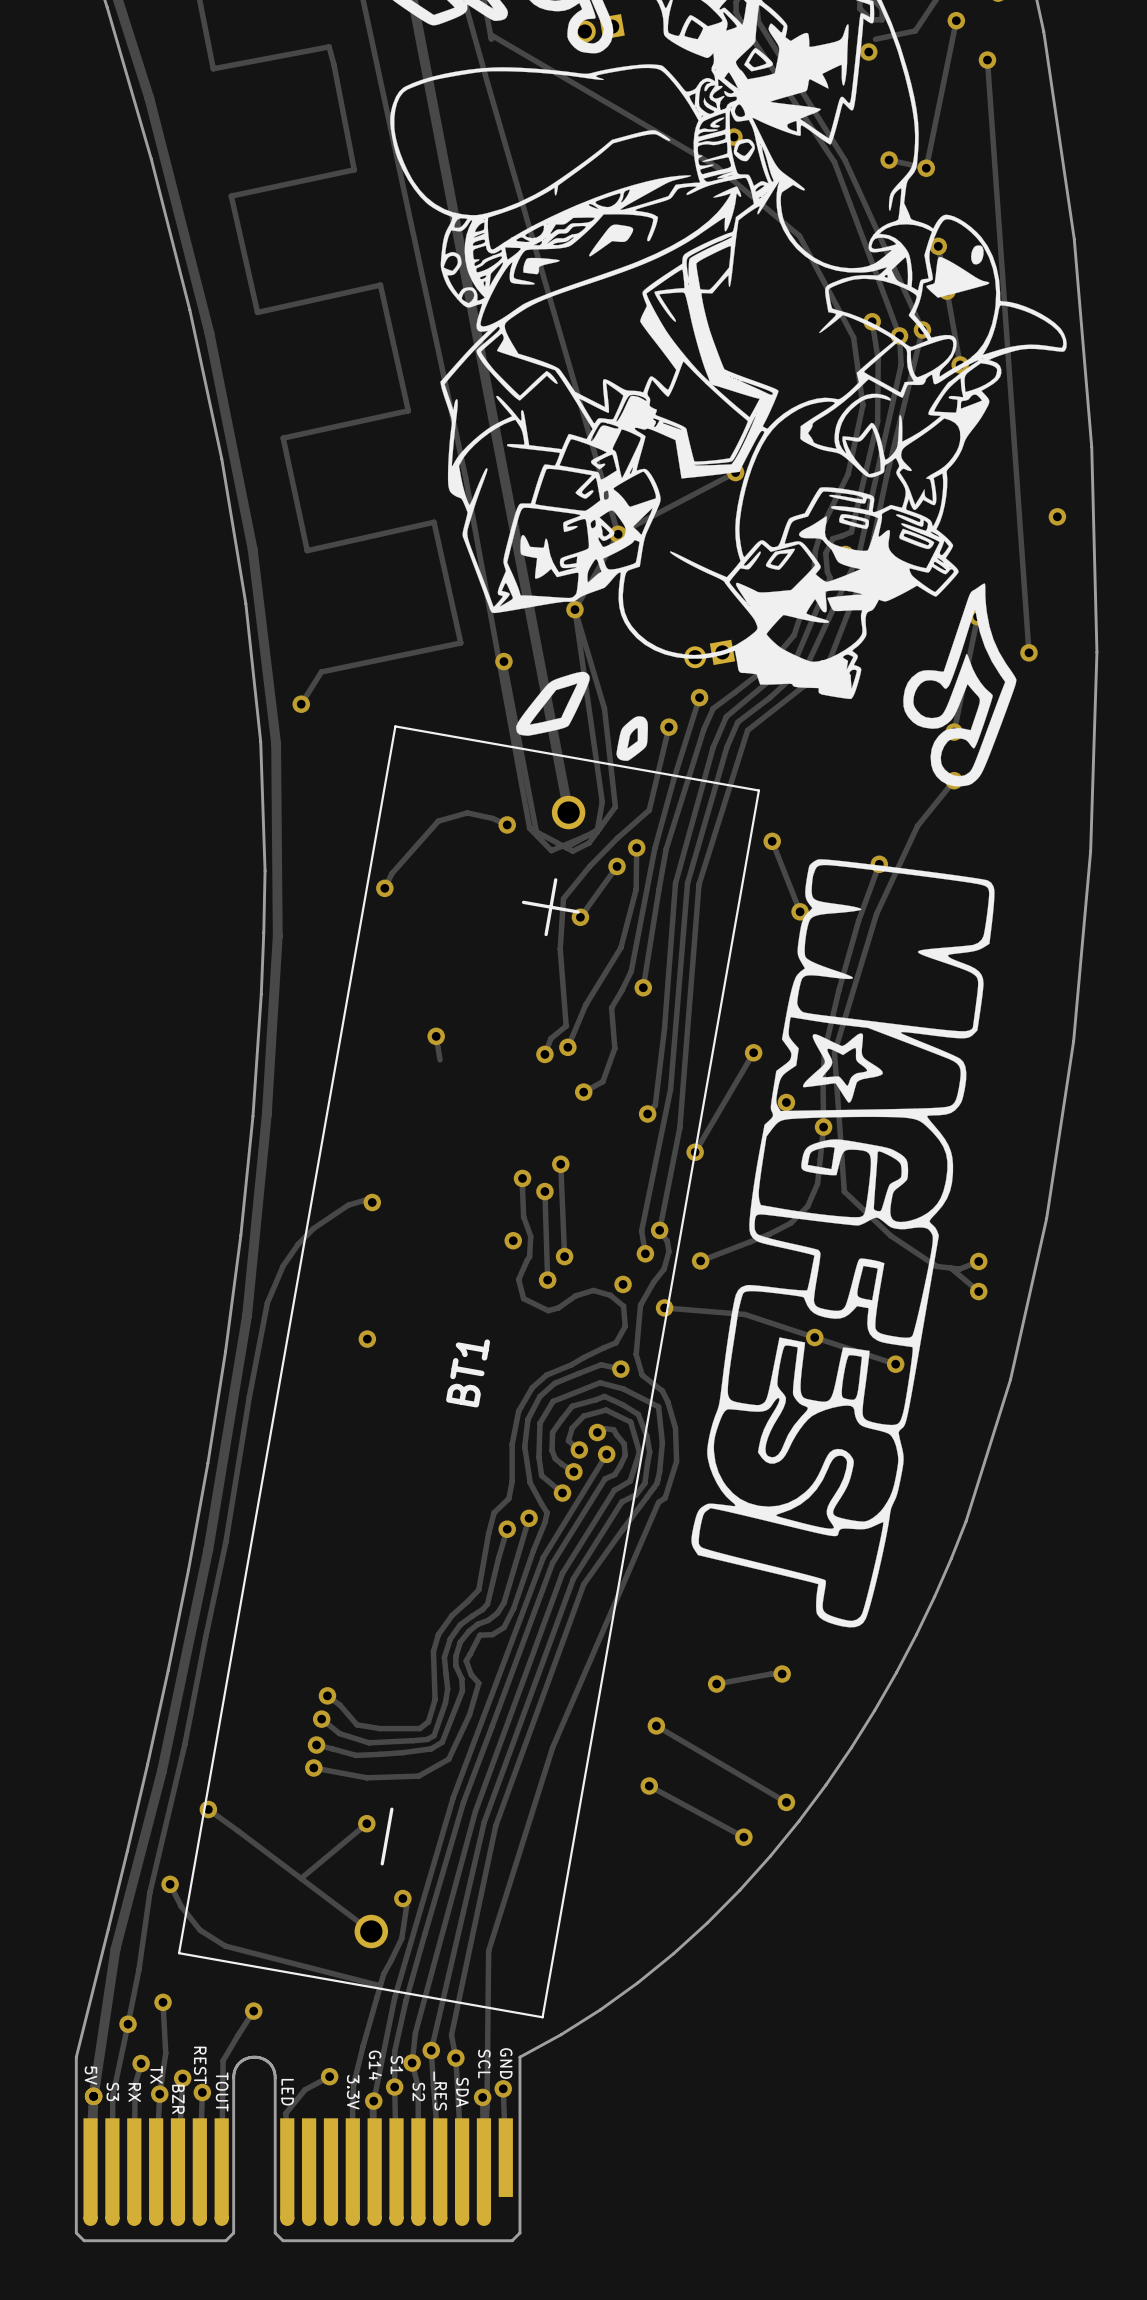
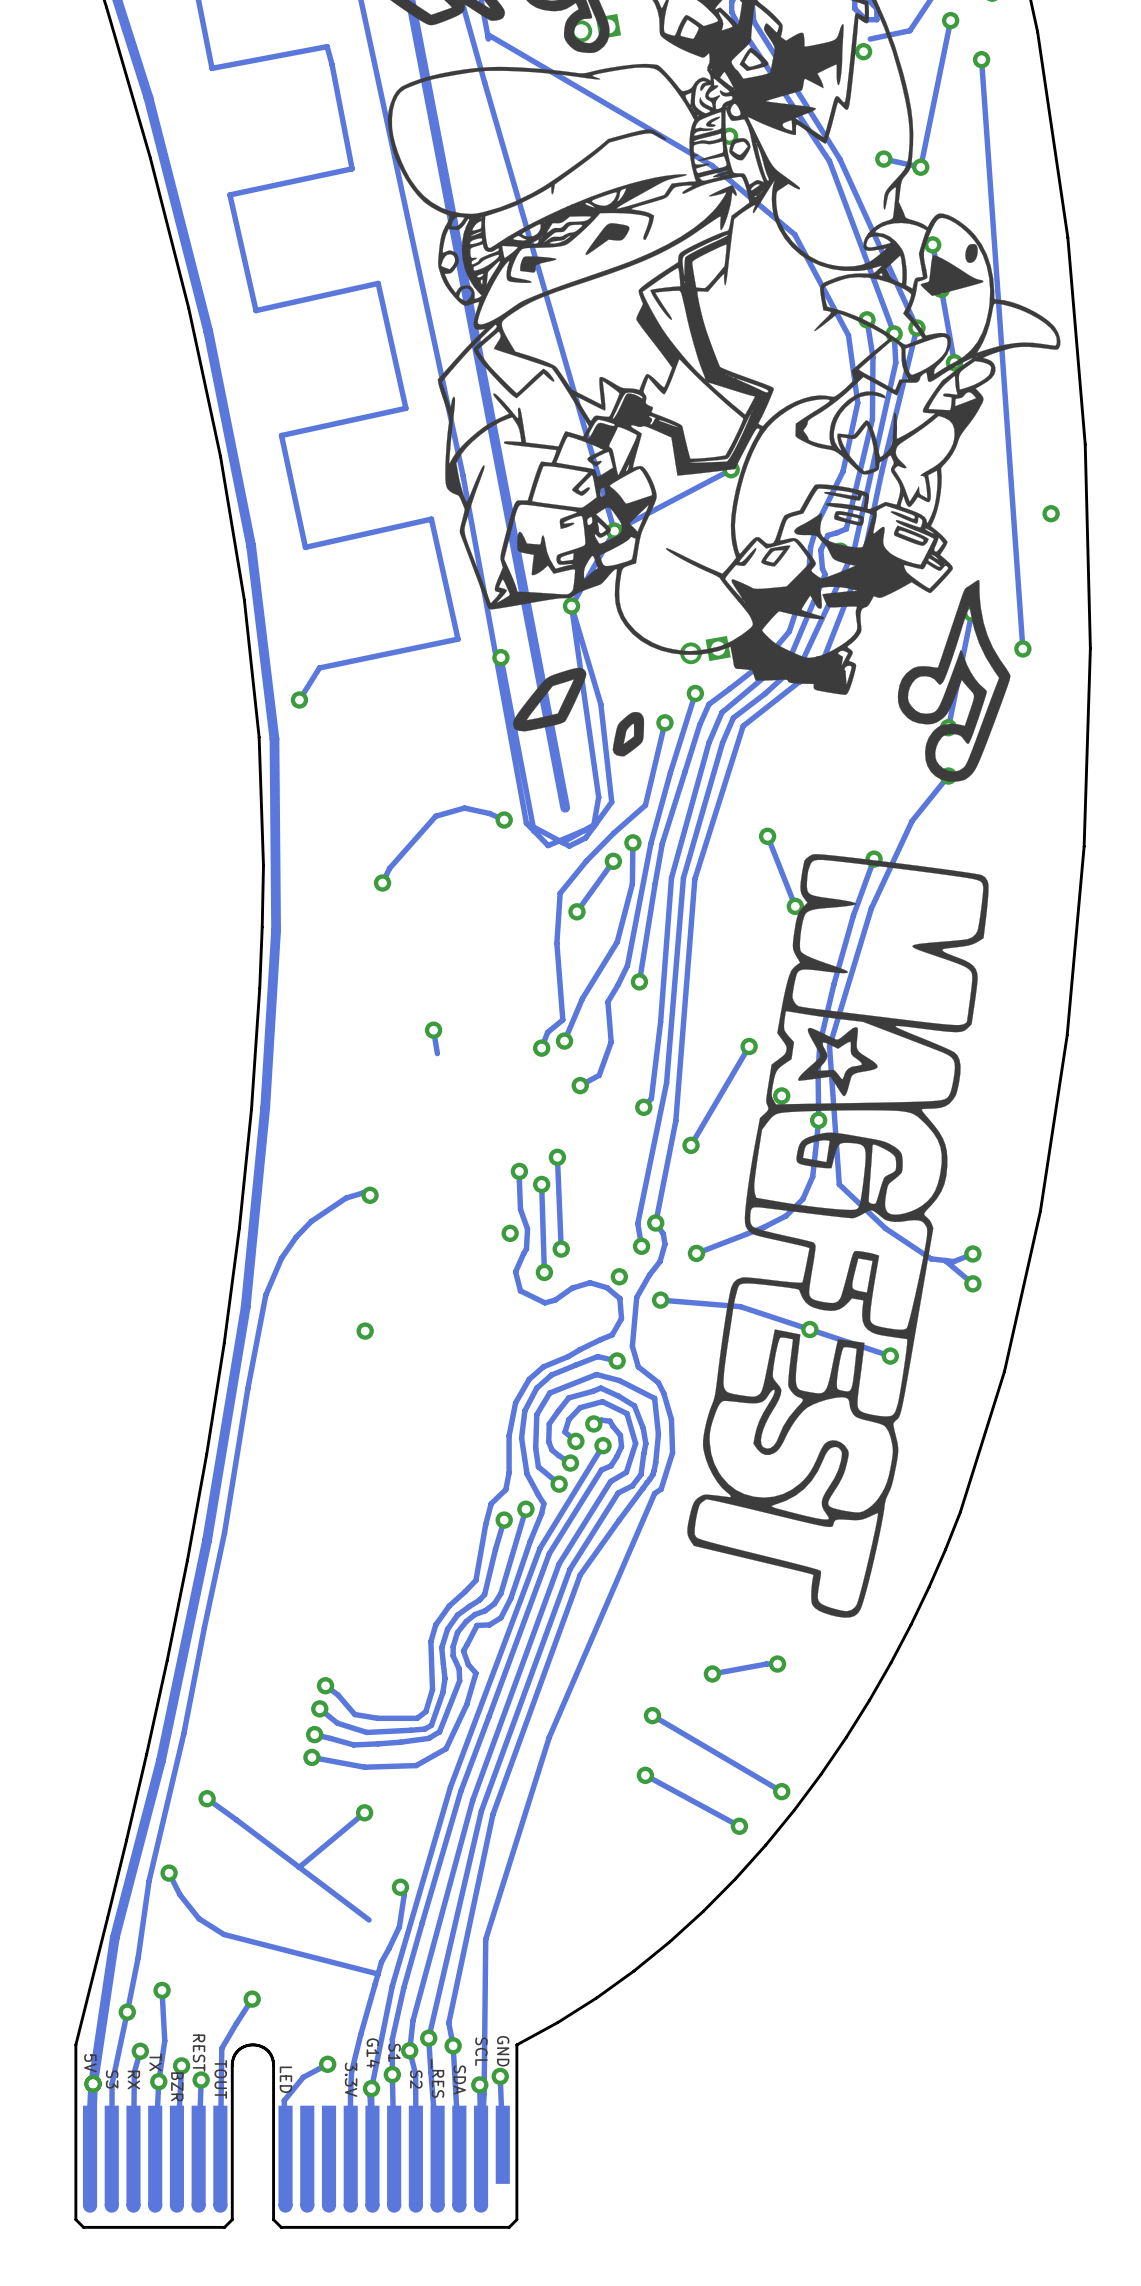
BT1: (468, 1371) -> none

